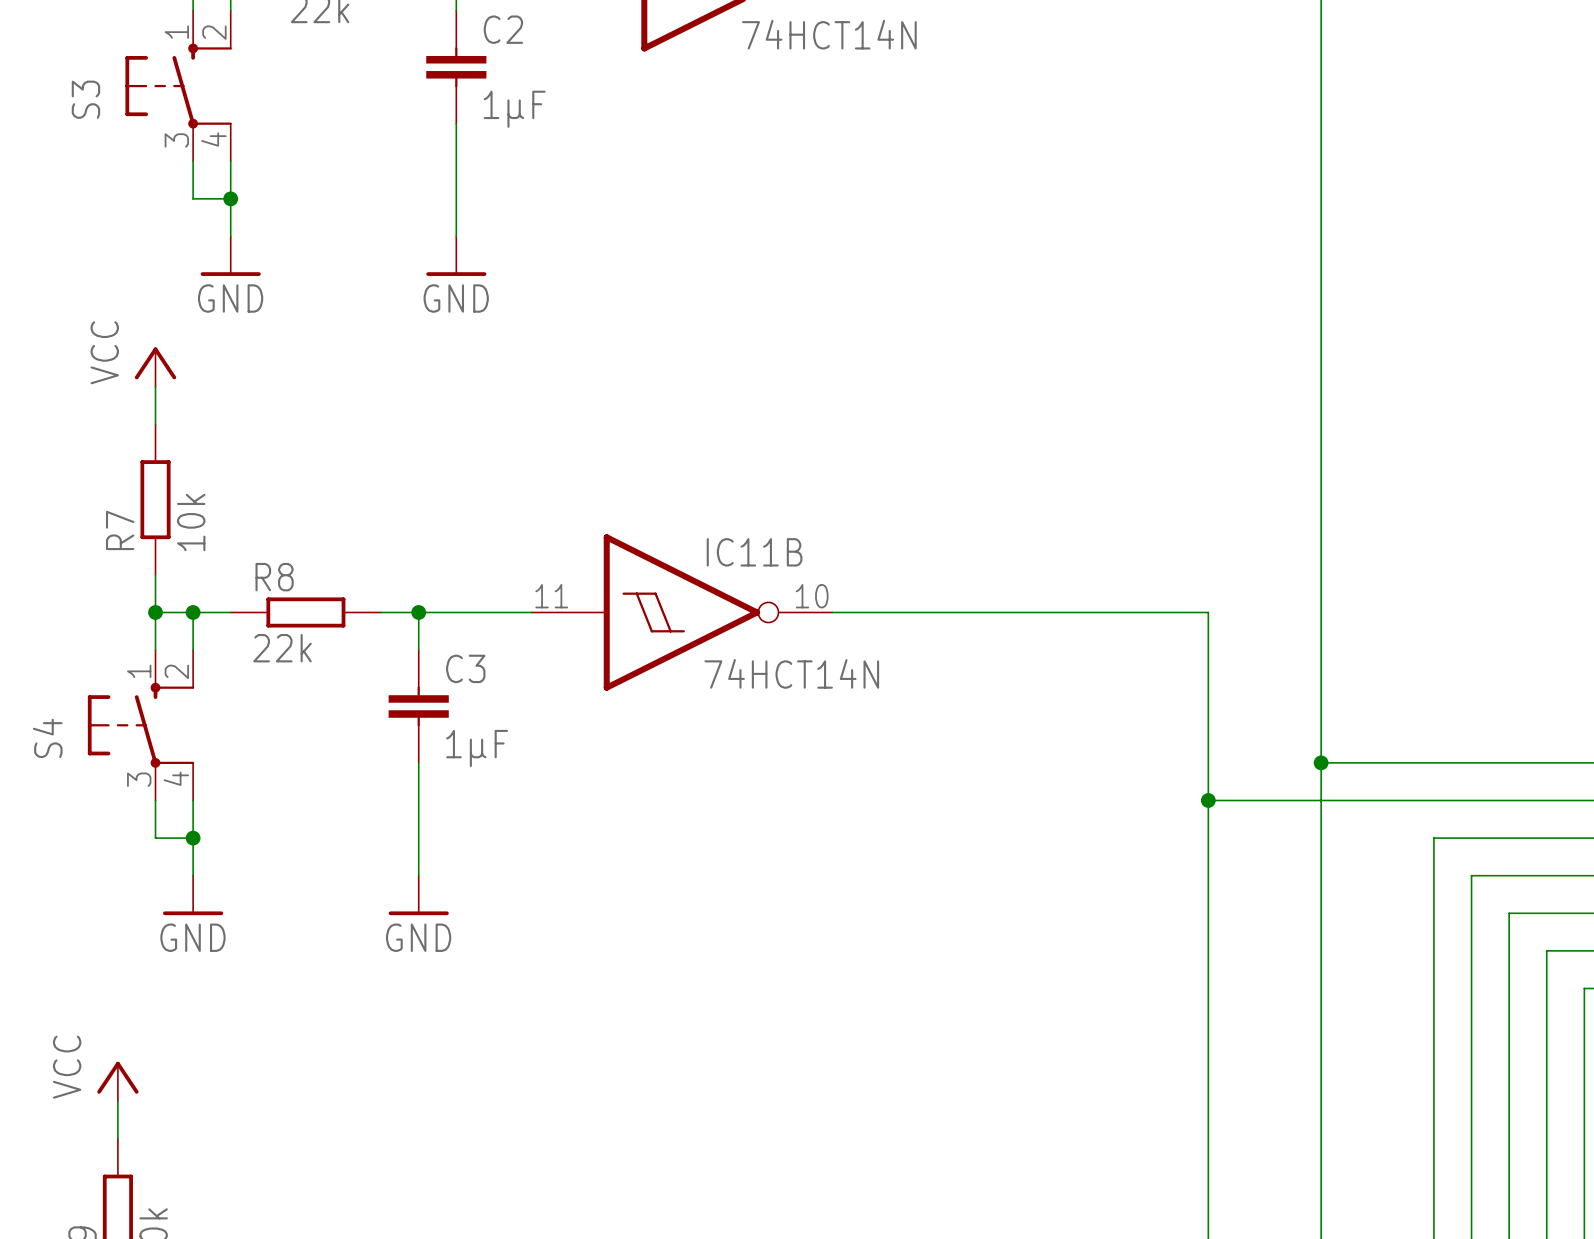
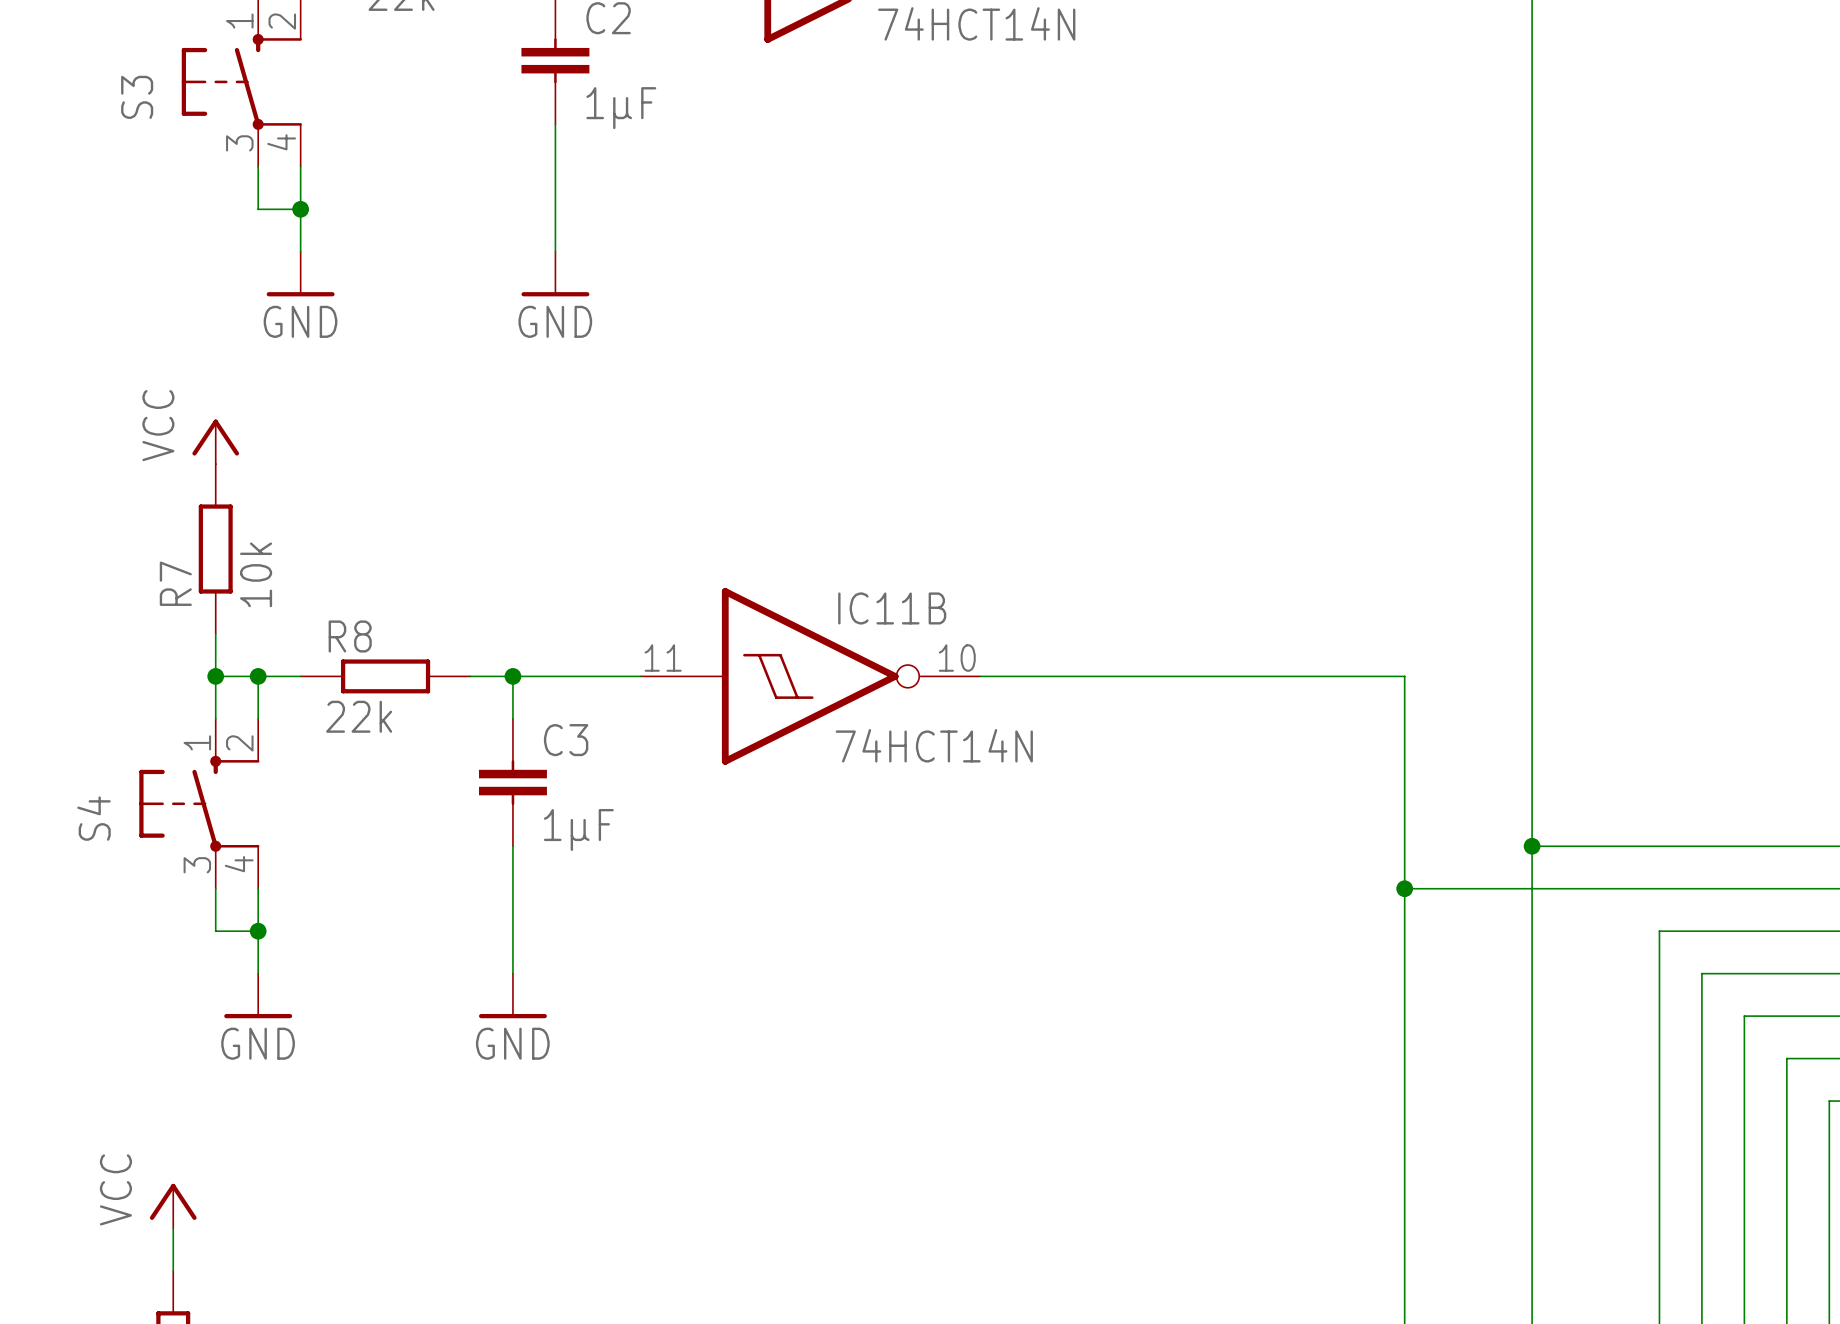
power symbol position: VCC (155, 367) -> VCC (215, 441)

